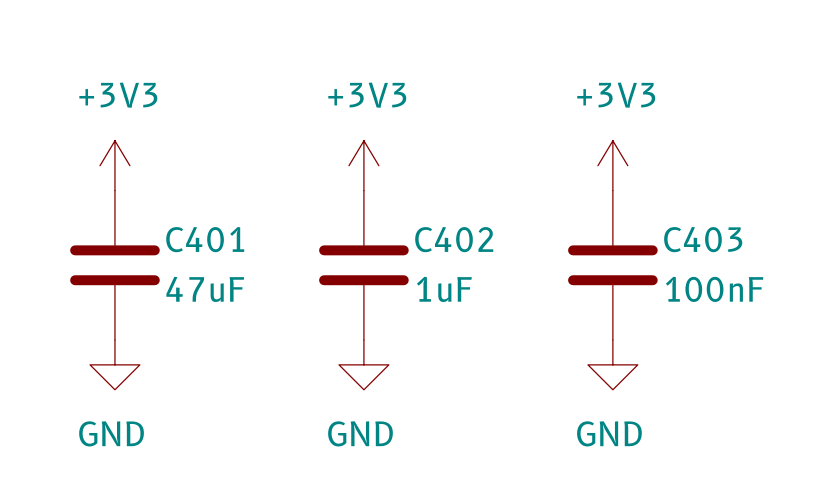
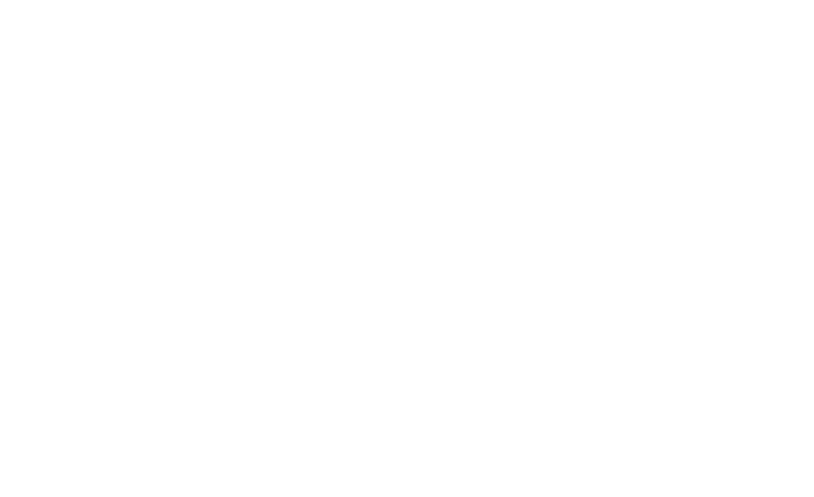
power symbol: +3V3 (114, 165) -> none
power symbol: +3V3 (363, 165) -> none
power symbol: +3V3 (612, 165) -> none
C401: 47uF (114, 265) -> none
C402: 1uF (363, 265) -> none
C403: 100nF (612, 265) -> none
power symbol: GND (114, 364) -> none
power symbol: GND (363, 364) -> none
power symbol: GND (612, 364) -> none

